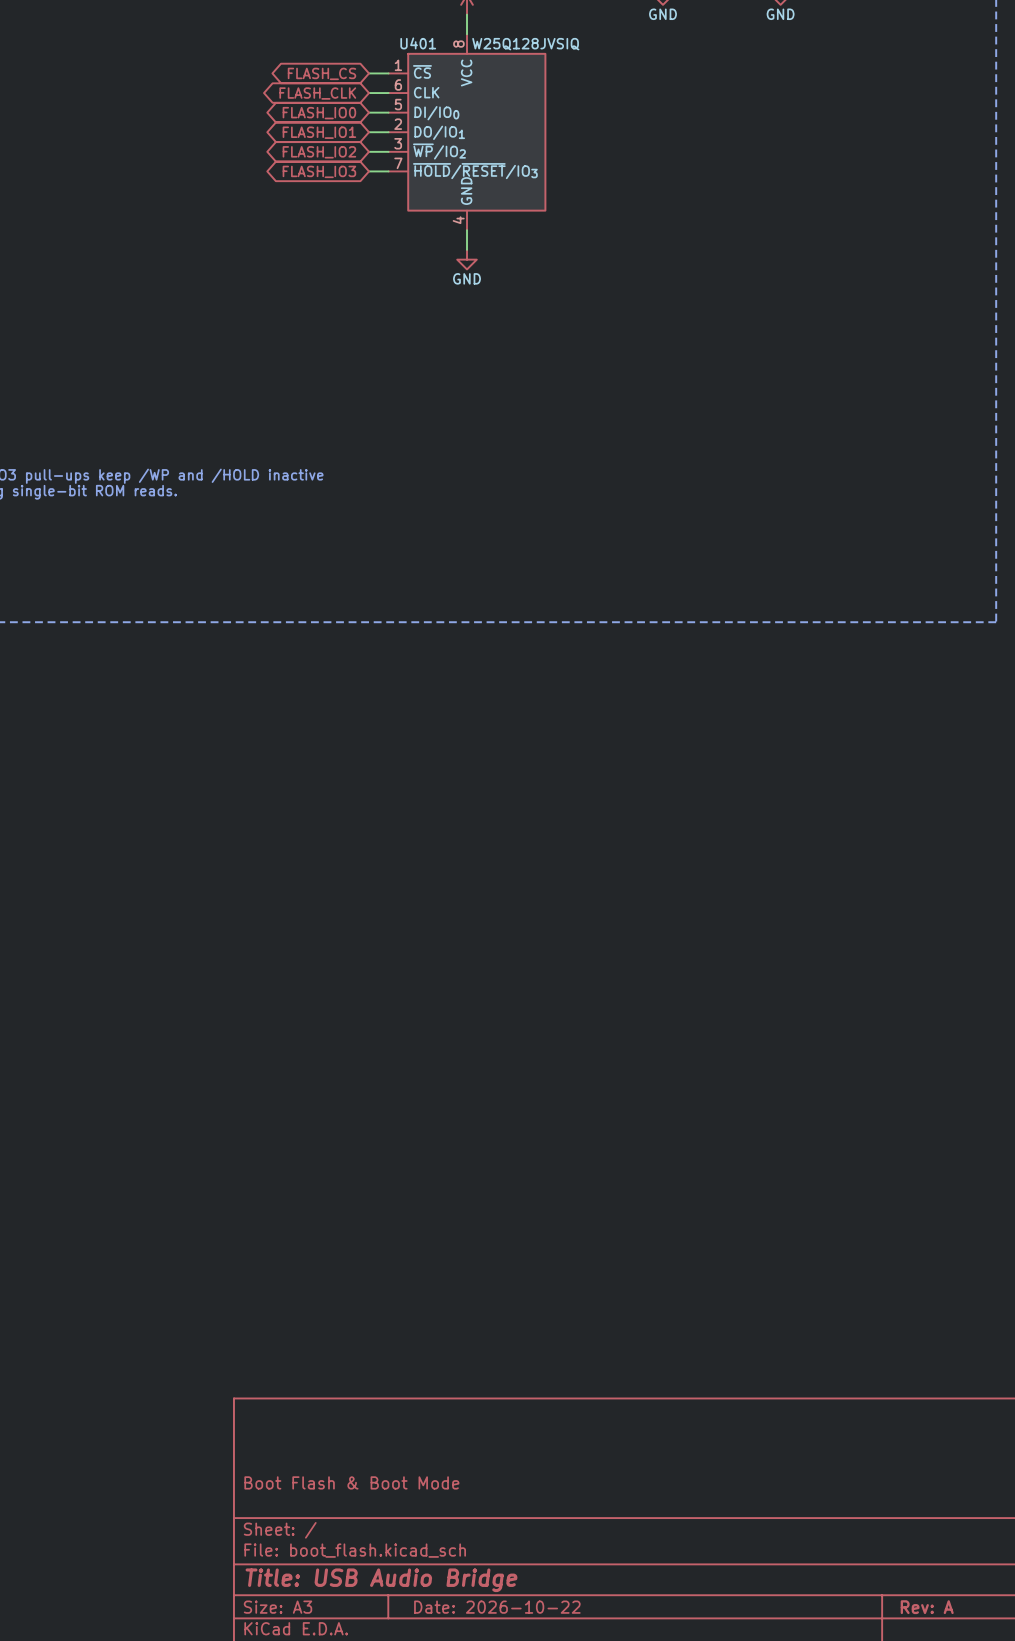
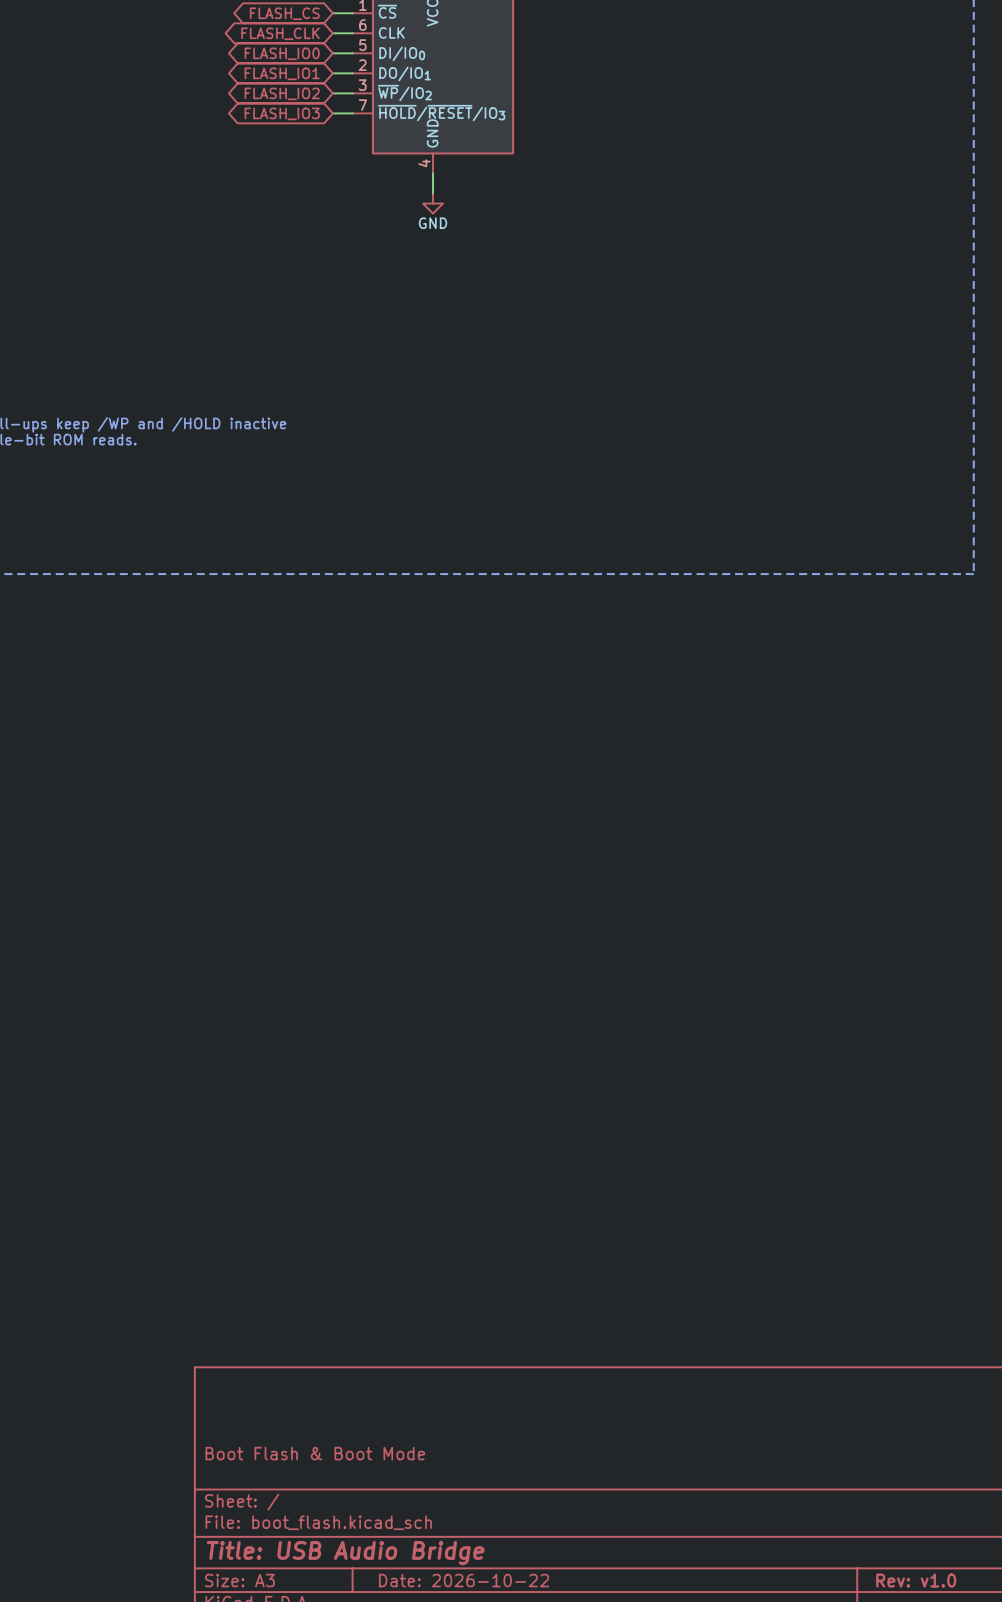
title block: Rev: A (927, 1607) -> Rev: v1.0 (916, 1580)

